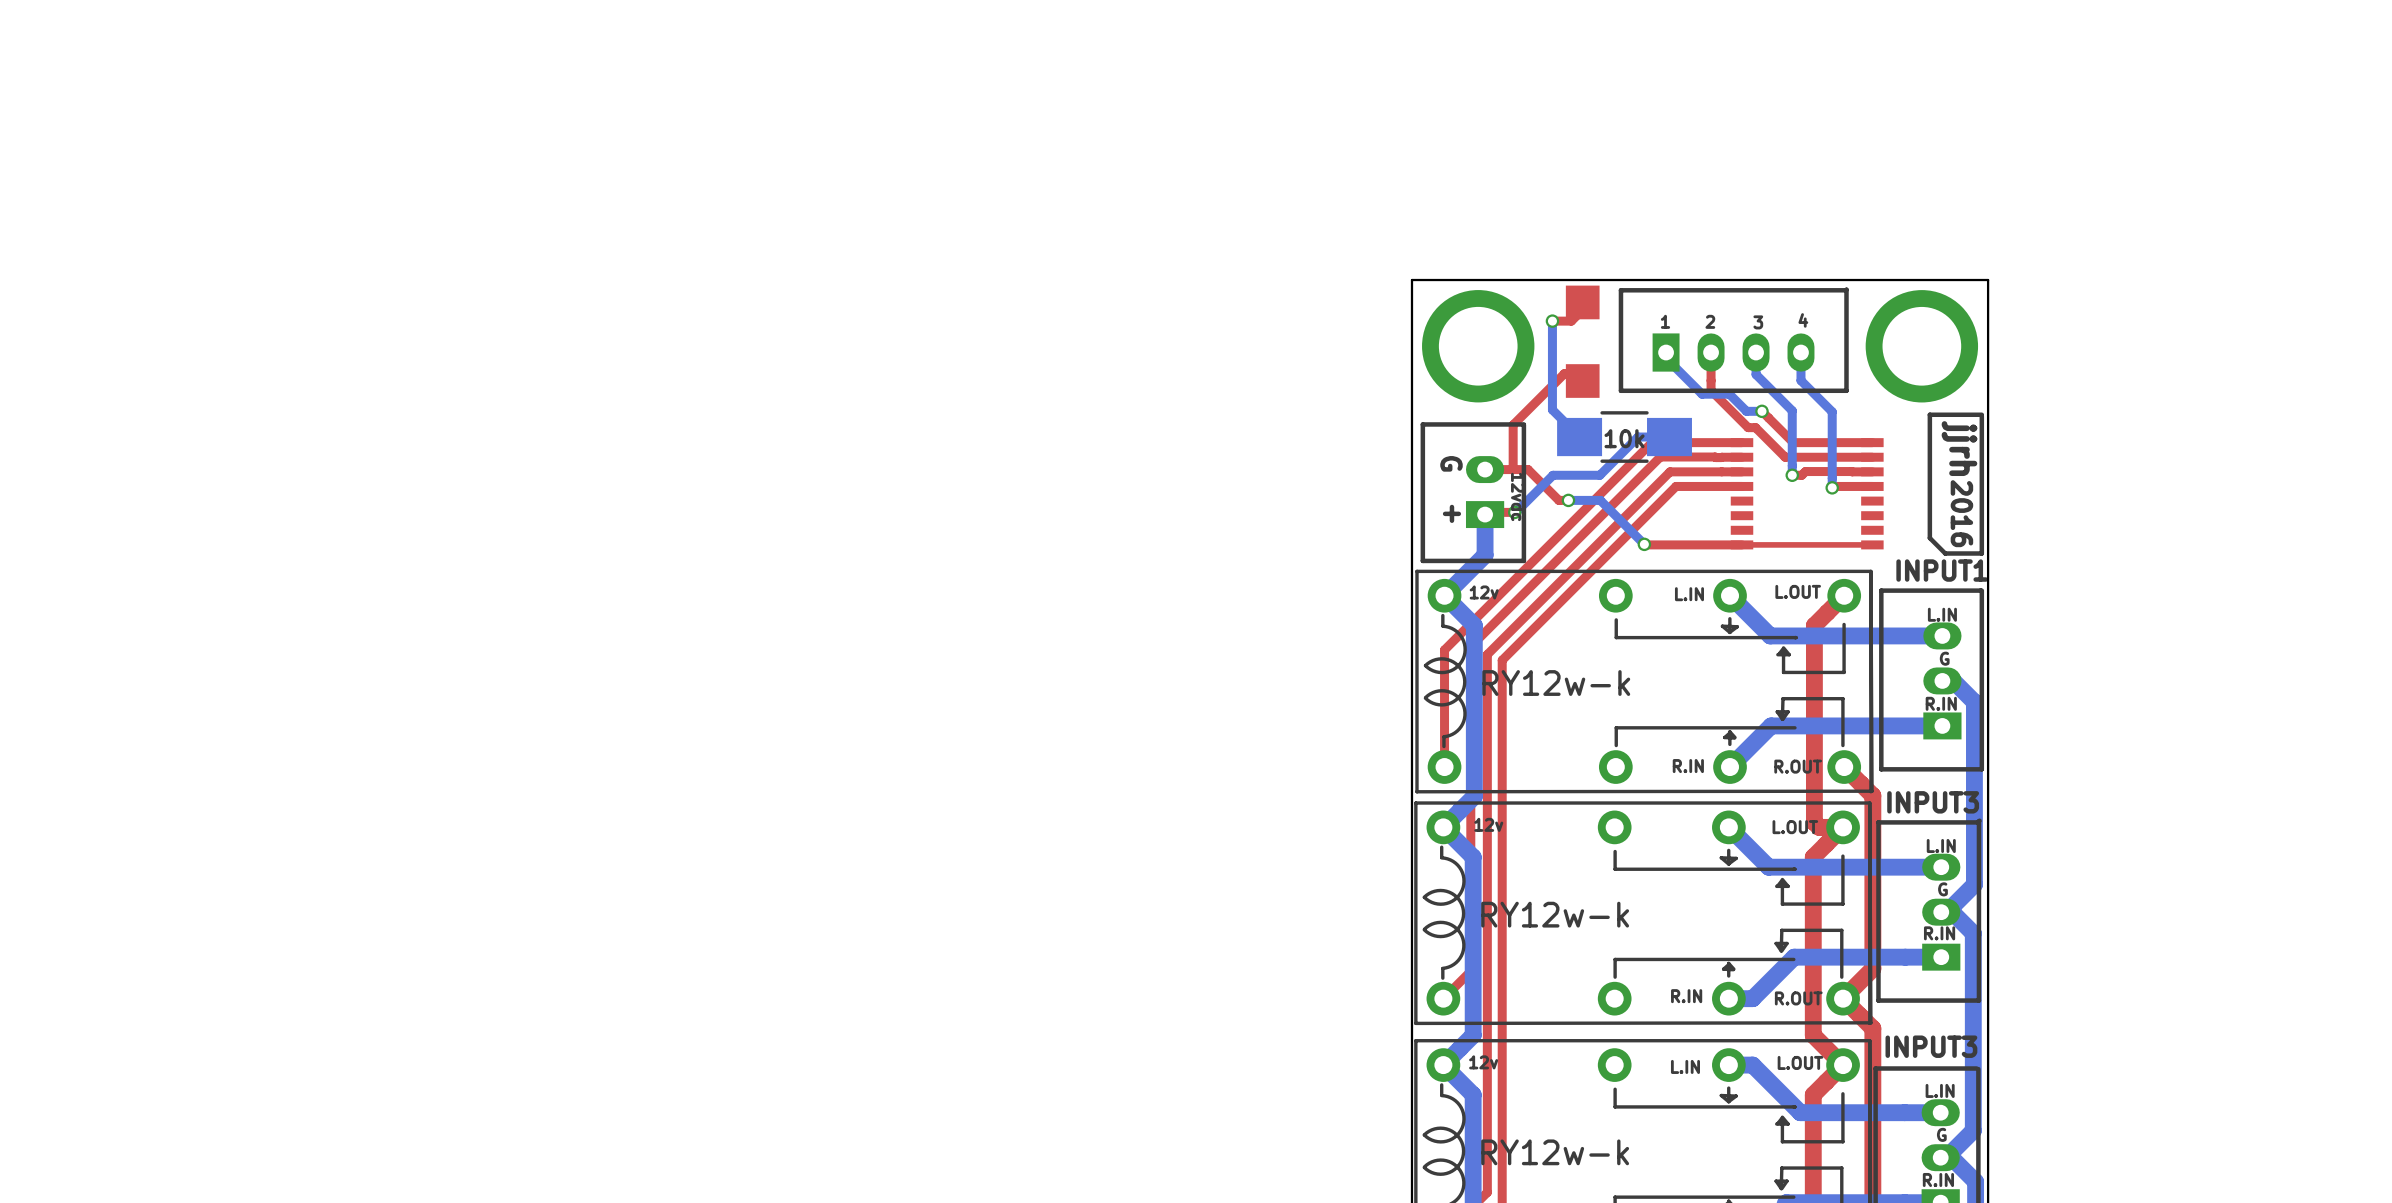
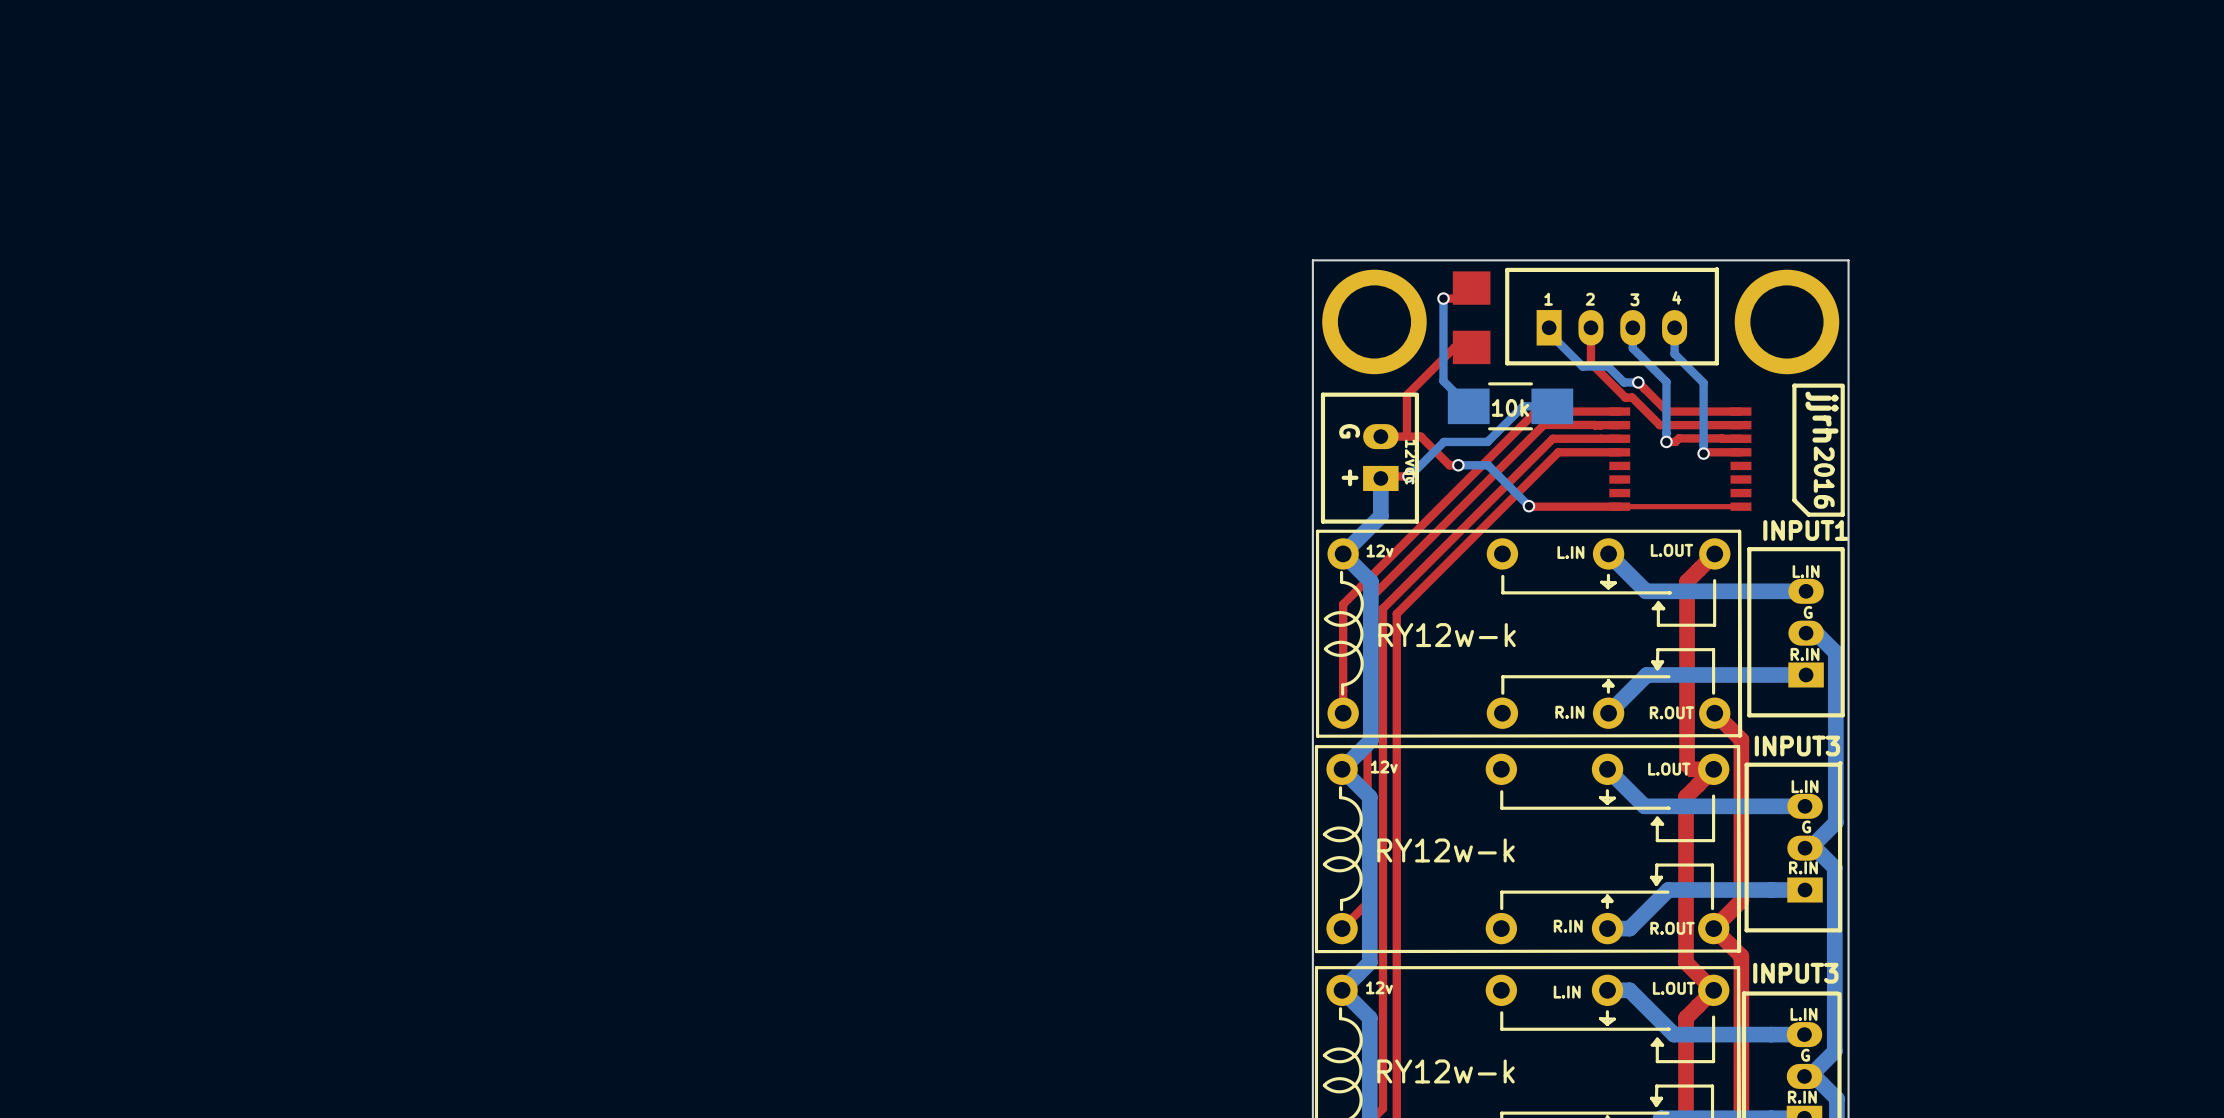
part footprint: [1565, 285, 1600, 398] -> [1452, 271, 1491, 365]

